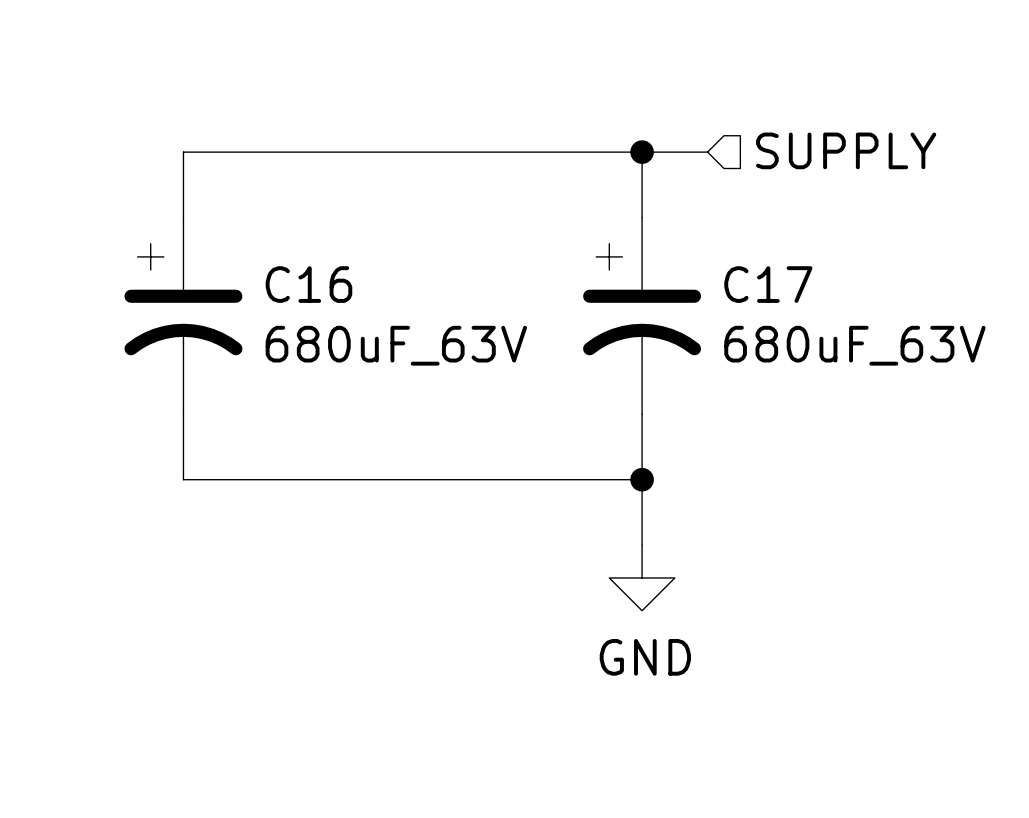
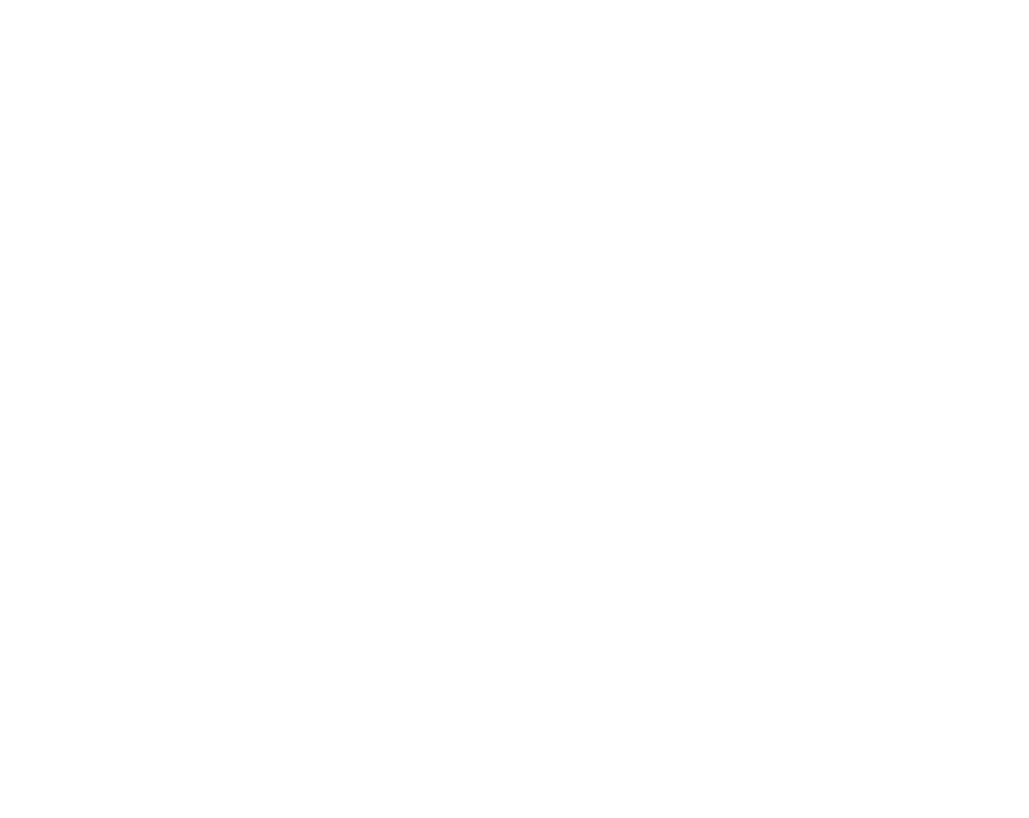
hierarchical label: SUPPLY (846, 150) -> none
wire: (642, 152) (642, 217) -> none
junction: (642, 152) -> none
wire: (707, 152) (183, 152) (183, 217) -> none
C16: 680uF_63V (183, 315) -> none
C17: 680uF_63V (642, 315) -> none
wire: (183, 414) (183, 479) (642, 479) -> none
wire: (642, 414) (642, 545) -> none
junction: (642, 479) -> none
power symbol: GND (642, 577) -> none

